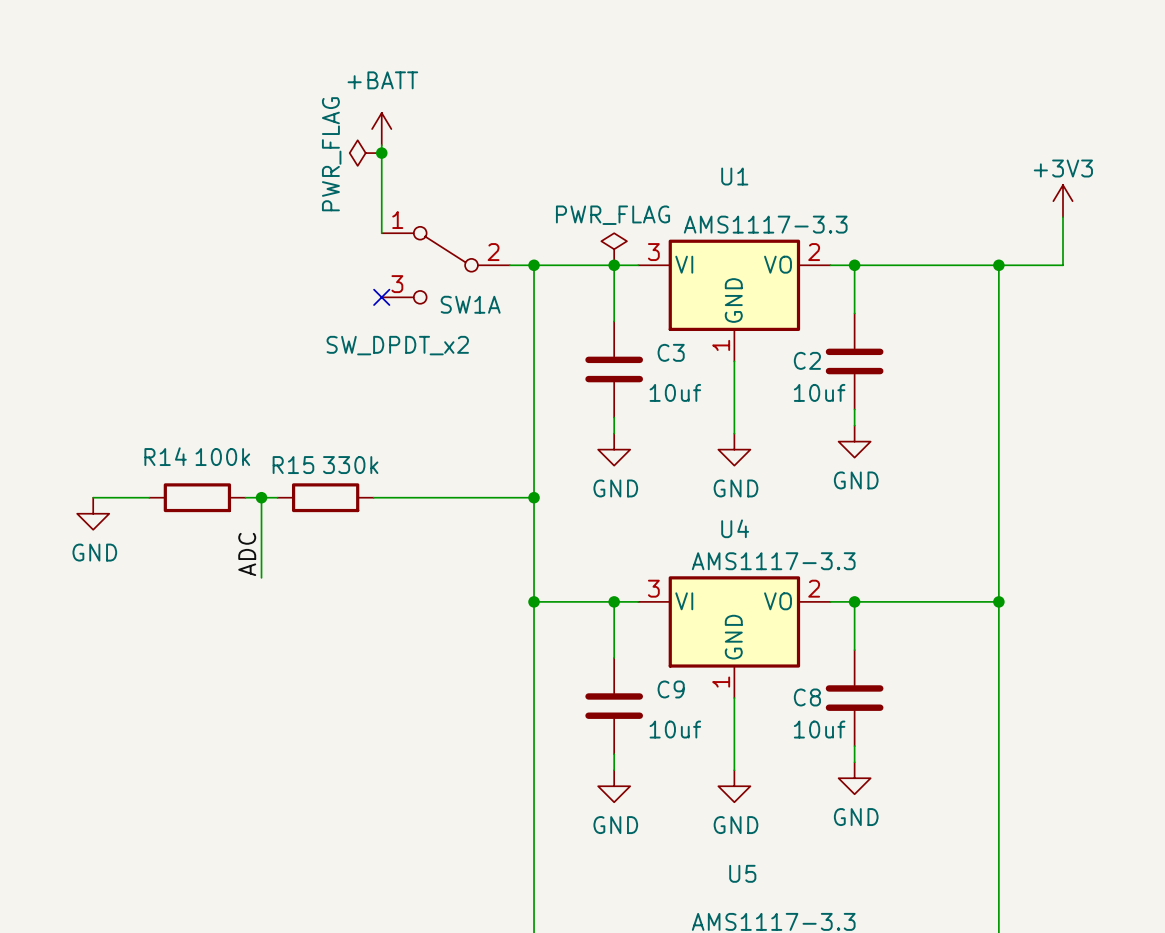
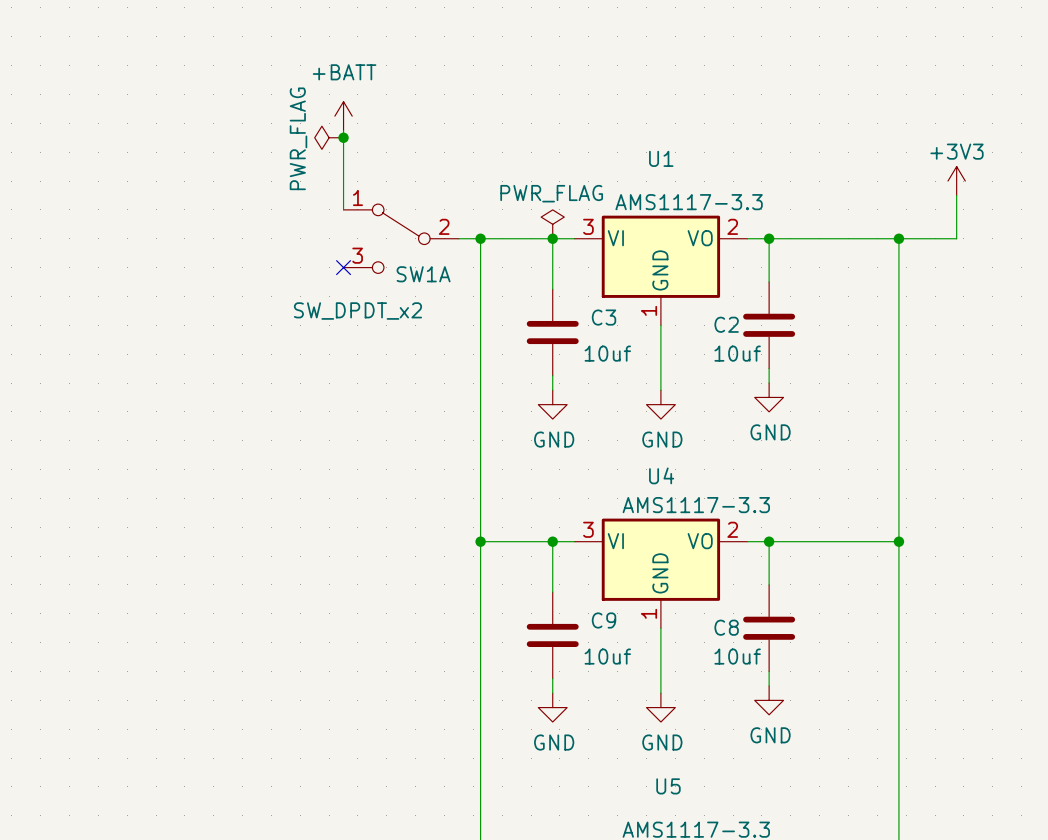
wire: (93, 497) (149, 497) -> none
R14: 100k (197, 497) -> none
wire: (245, 497) (277, 497) -> none
wire: (261, 497) (261, 577) -> none
junction: (261, 497) -> none
R15: 330k (325, 497) -> none
wire: (373, 497) (534, 497) -> none
junction: (534, 497) -> none
power symbol: GND (93, 513) -> none
label: ADC (247, 554) -> none

